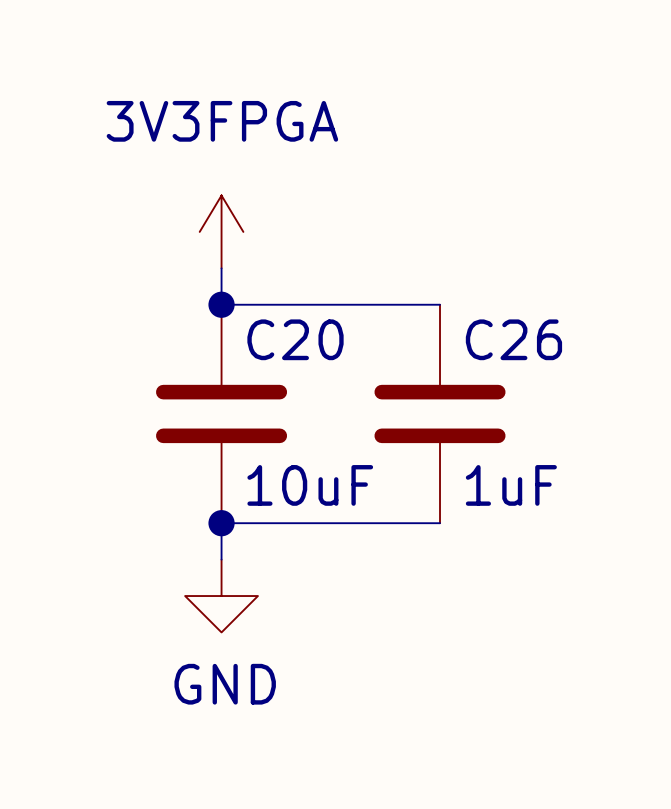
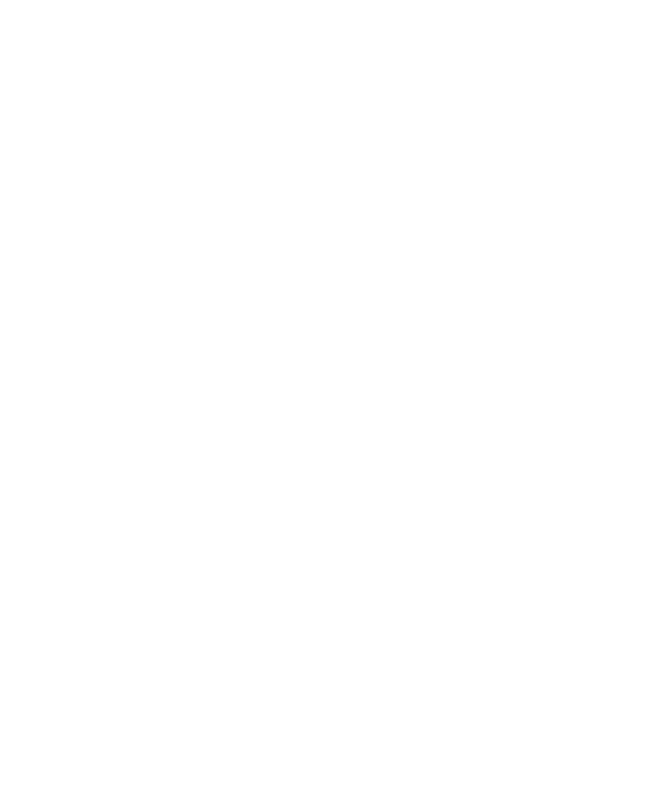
power symbol: 3V3FPGA (221, 231) -> none
wire: (221, 268) (221, 304) (440, 304) -> none
junction: (221, 304) -> none
C20: 10uF (221, 413) -> none
C26: 1uF (440, 413) -> none
junction: (221, 523) -> none
wire: (440, 523) (221, 523) (221, 559) -> none
power symbol: GND (221, 596) -> none

